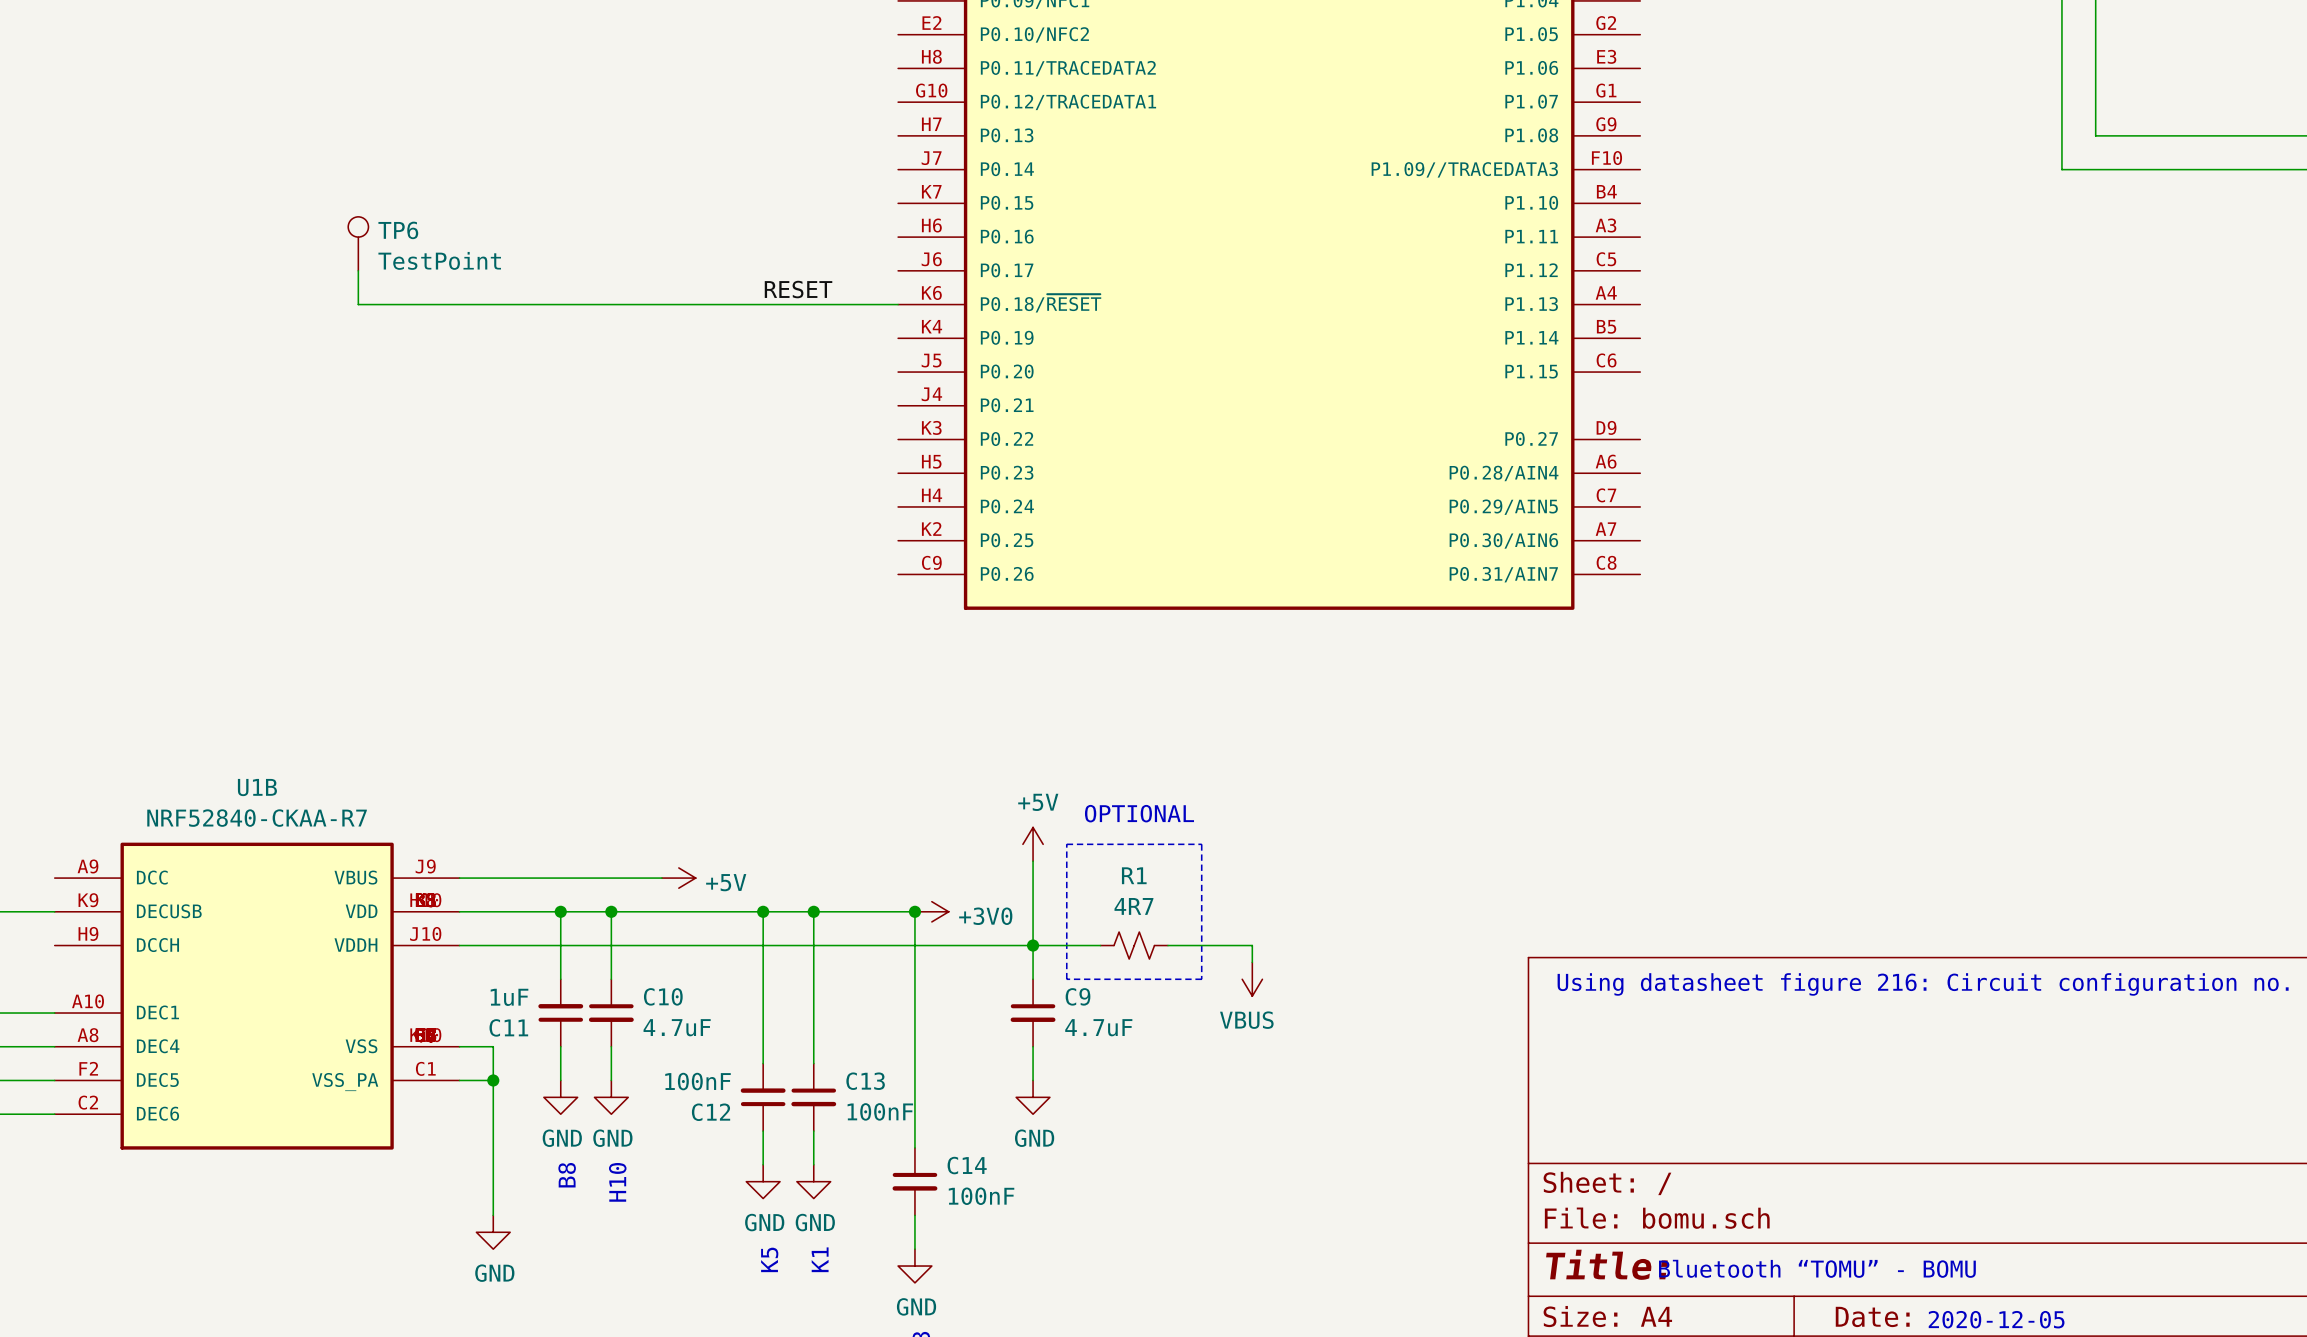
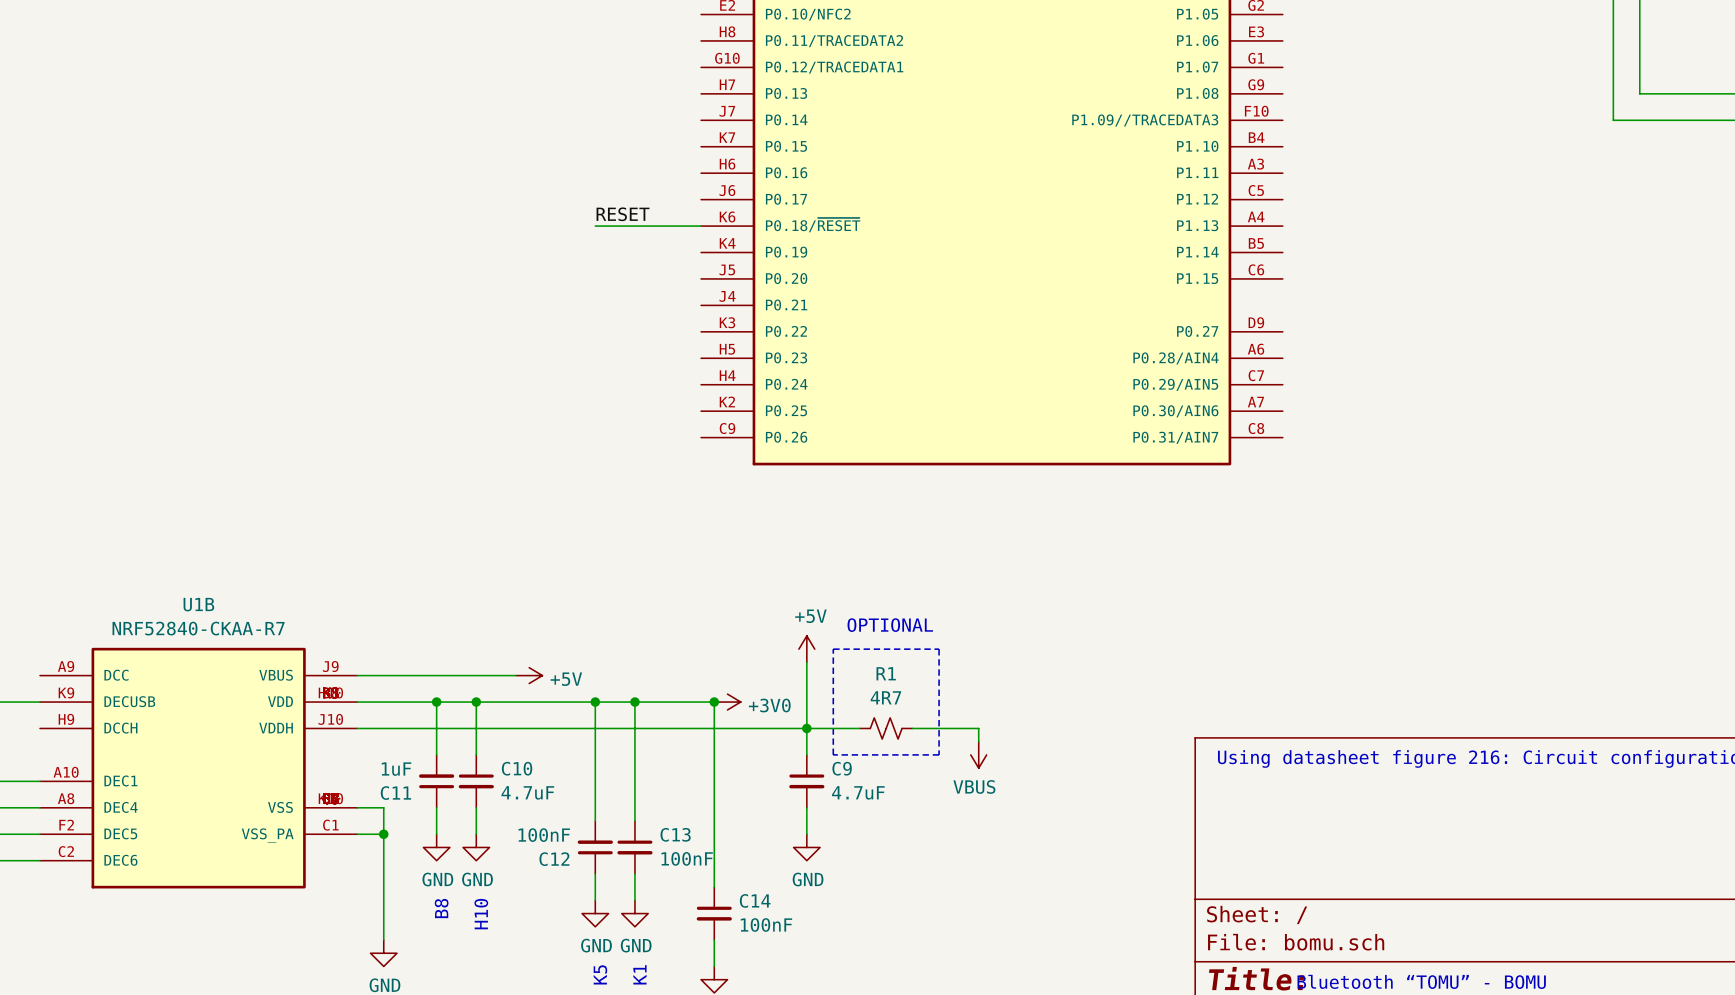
TP6: TestPoint (358, 243) -> none
wire: (358, 270) (358, 304) (763, 304) -> none

